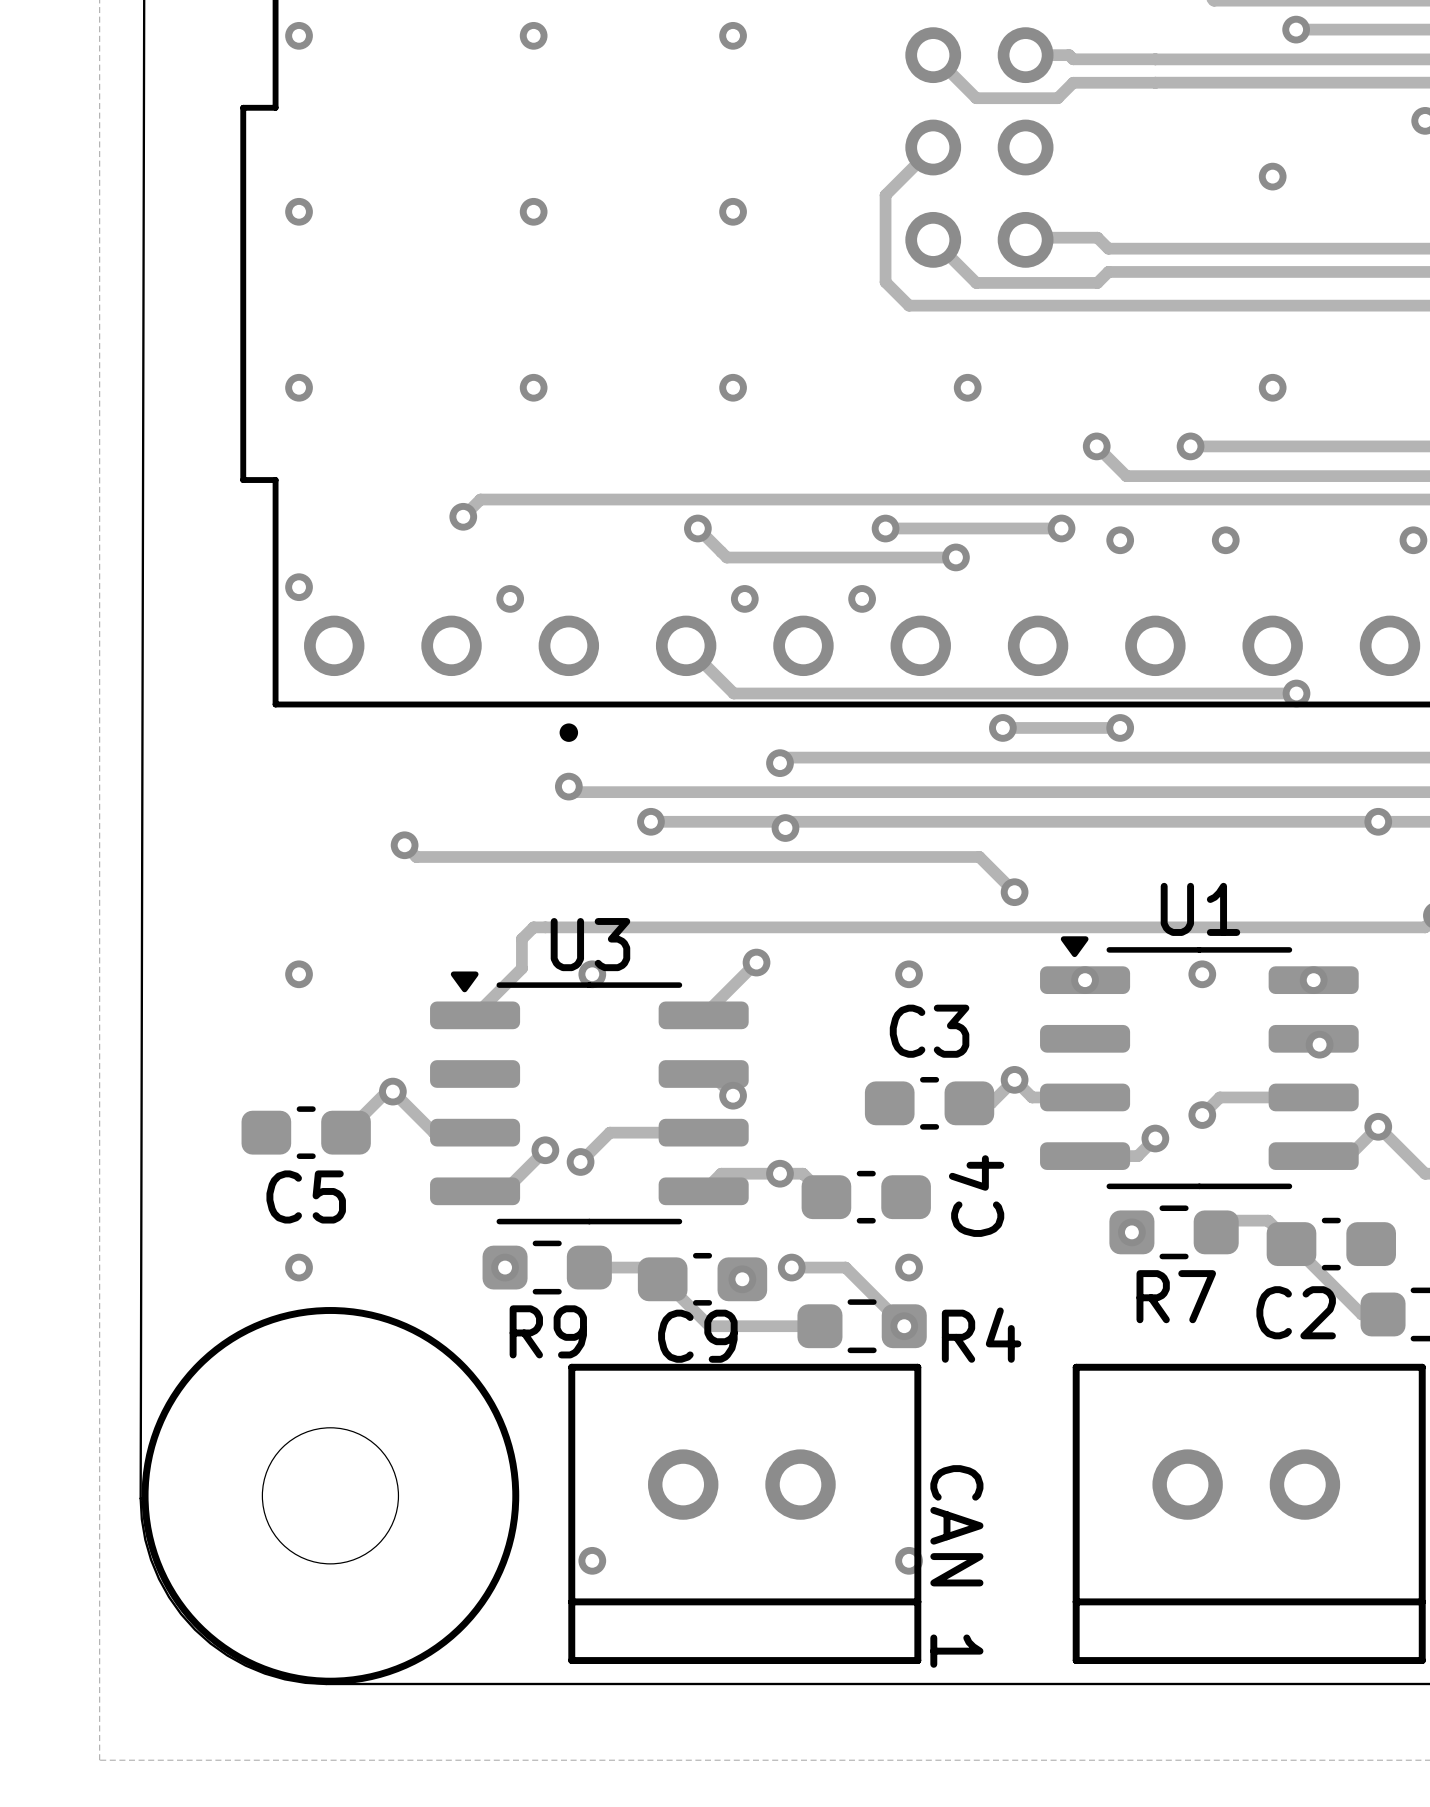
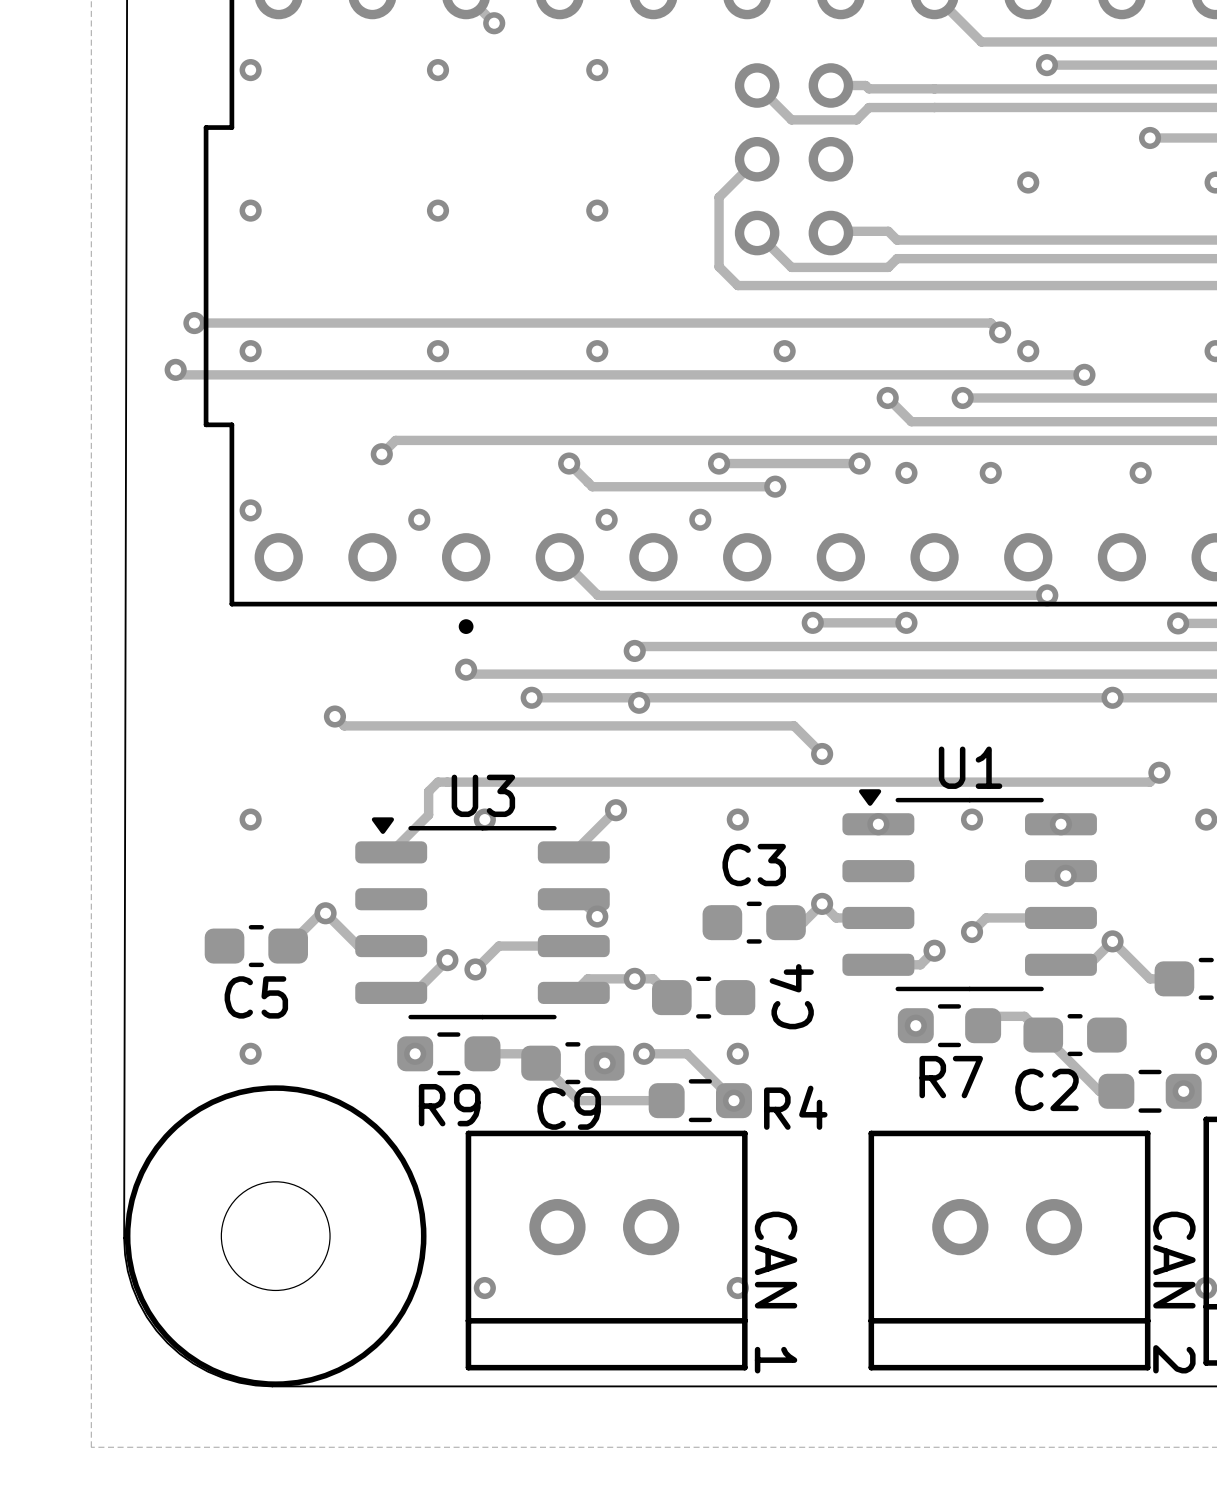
track: none -> (194, 323) (990, 323) (1000, 332)
via: none -> (194, 323)
via: none -> (1000, 332)
track: none -> (175, 369) (180, 374) (1084, 374)
via: none -> (175, 369)
via: none -> (1084, 374)

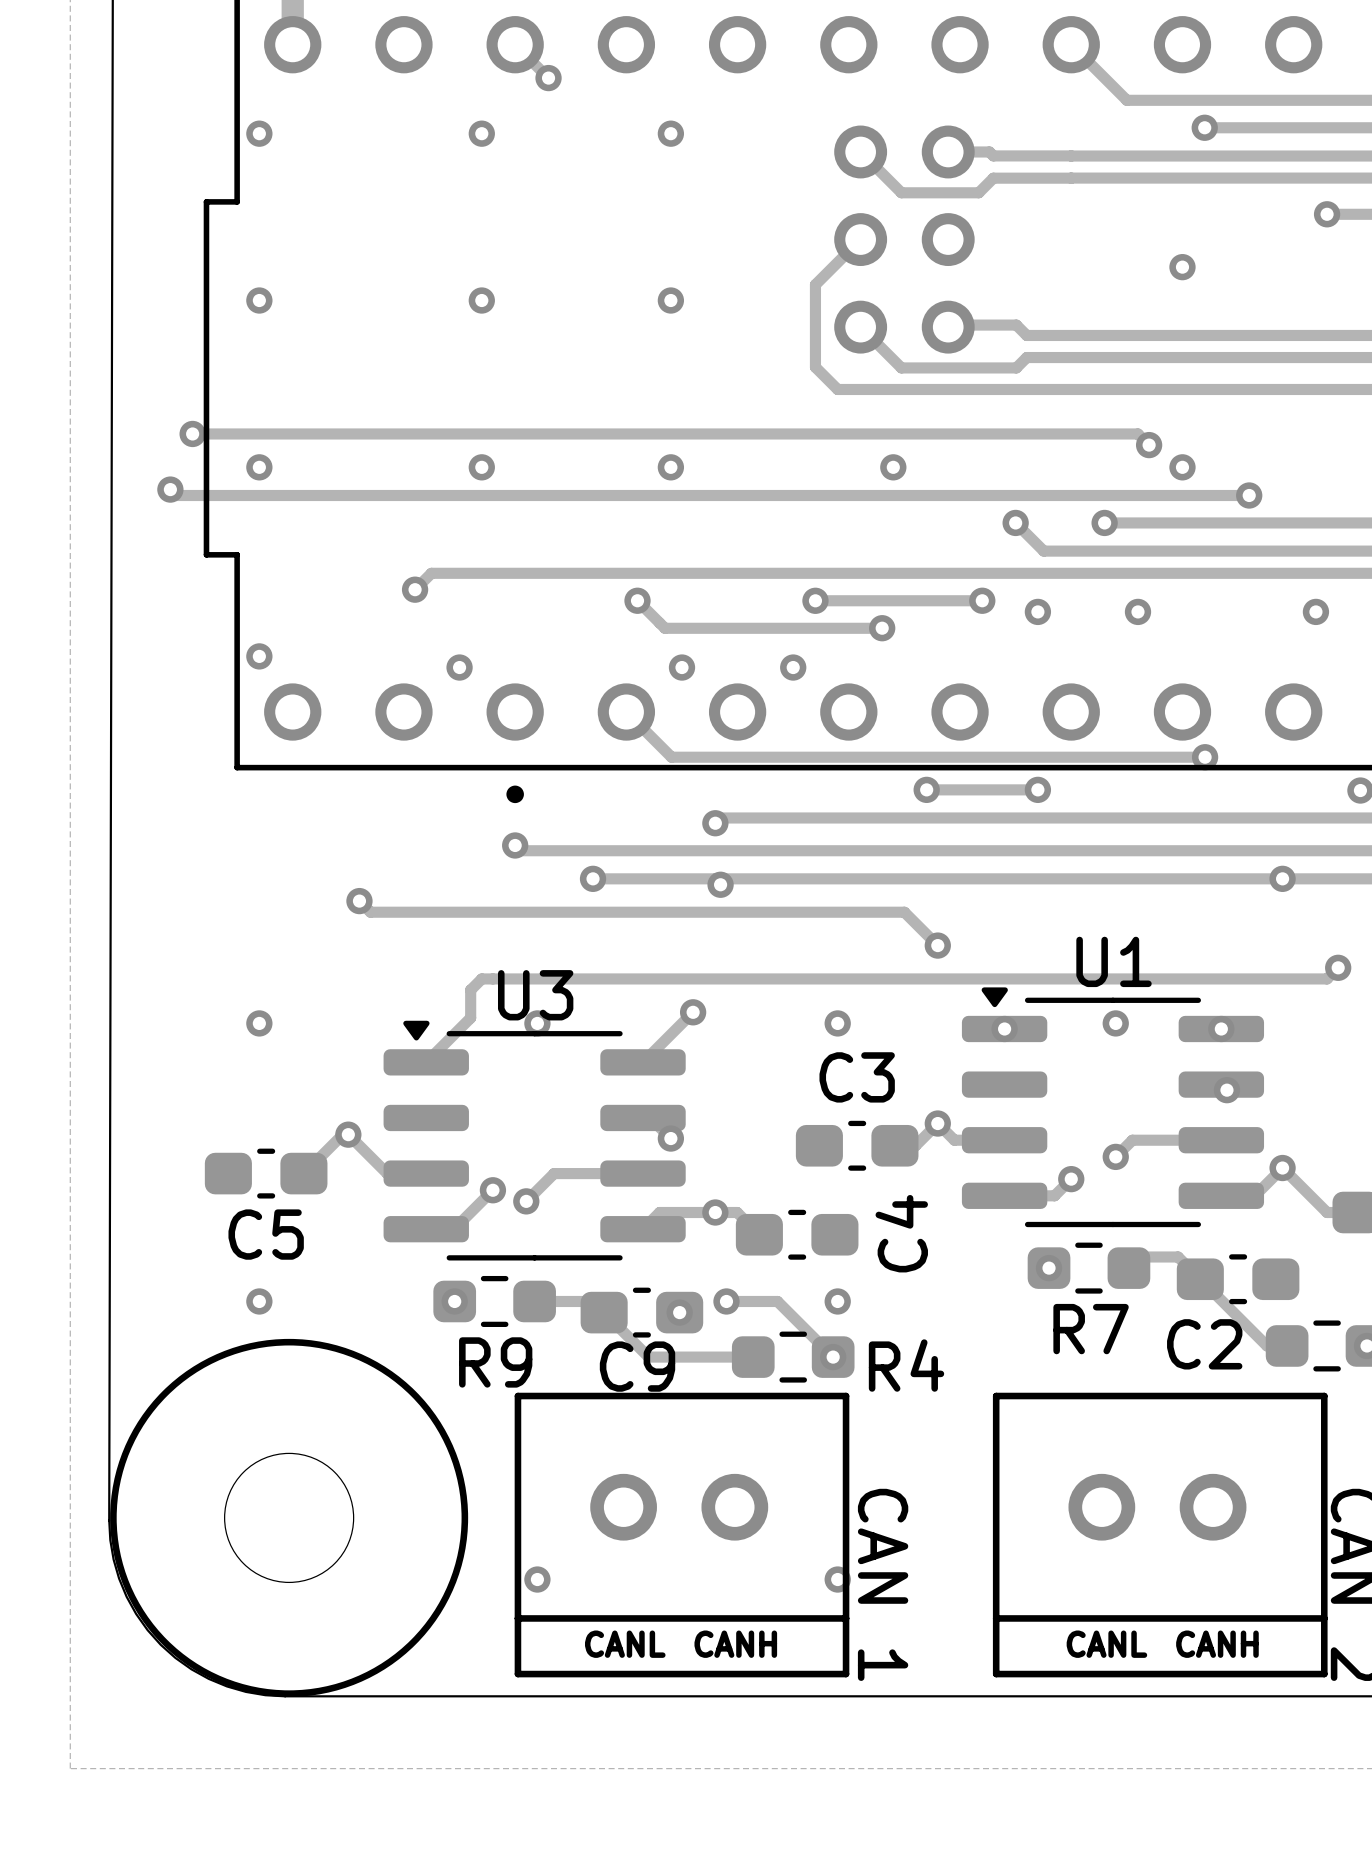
text: none -> CANL (625, 1644)
text: none -> CANH (735, 1644)
text: none -> CANL (1106, 1644)
text: none -> CANH (1217, 1644)

